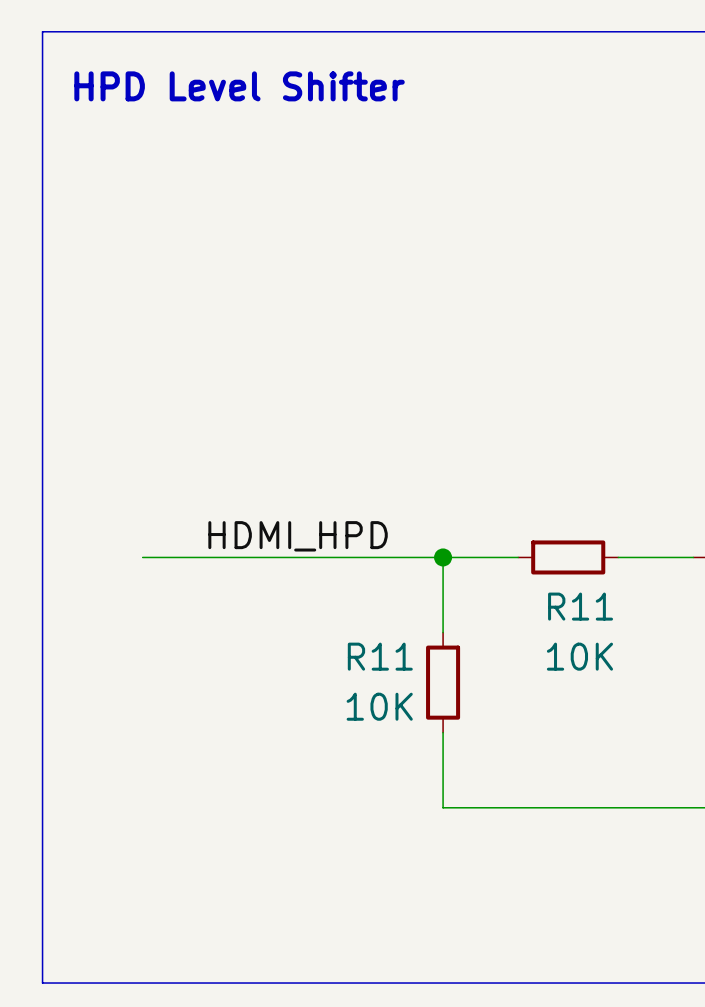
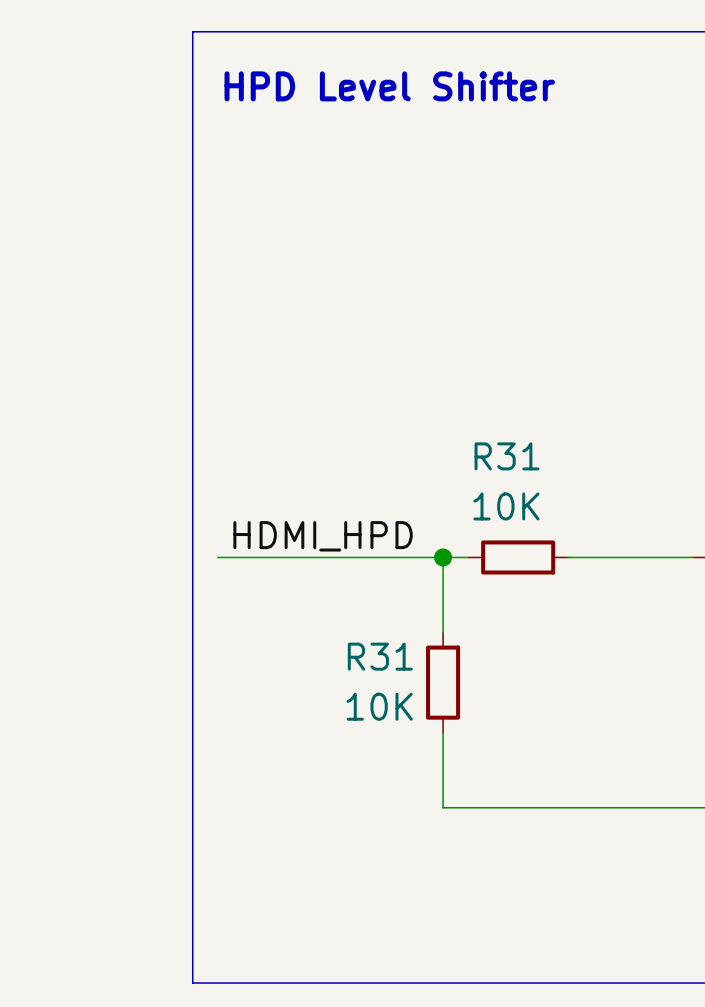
line: (192, 31) (42, 31) (42, 983) (192, 983) -> (192, 31) (192, 983)
text position: HPD Level Shifter (239, 86) -> HPD Level Shifter (389, 86)
label position: HDMI_HPD (298, 536) -> HDMI_HPD (323, 536)
wire: (142, 557) (217, 557) -> none
wire: (468, 557) (518, 557) -> (568, 557) (618, 557)
R31: none -> 10K (518, 557)
R11: 10K (568, 557) -> none
R11 name: R11 (380, 656) -> R31 (380, 656)

